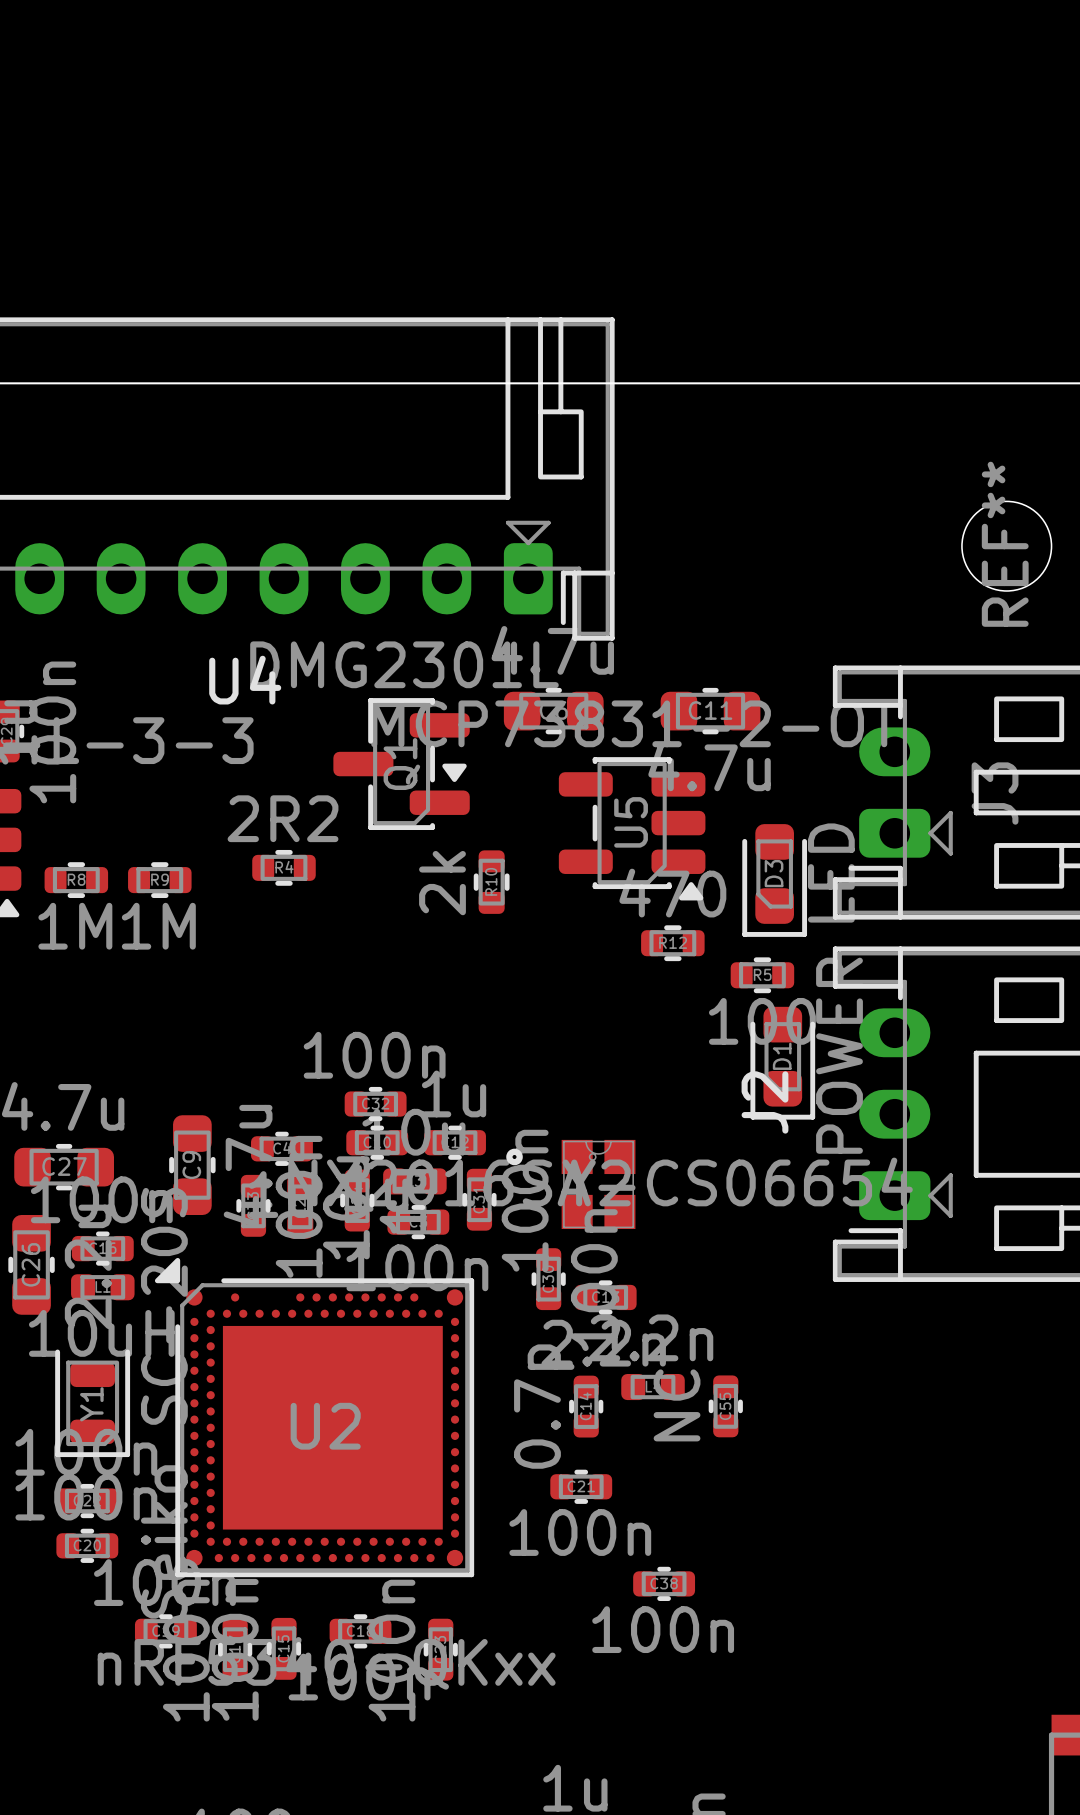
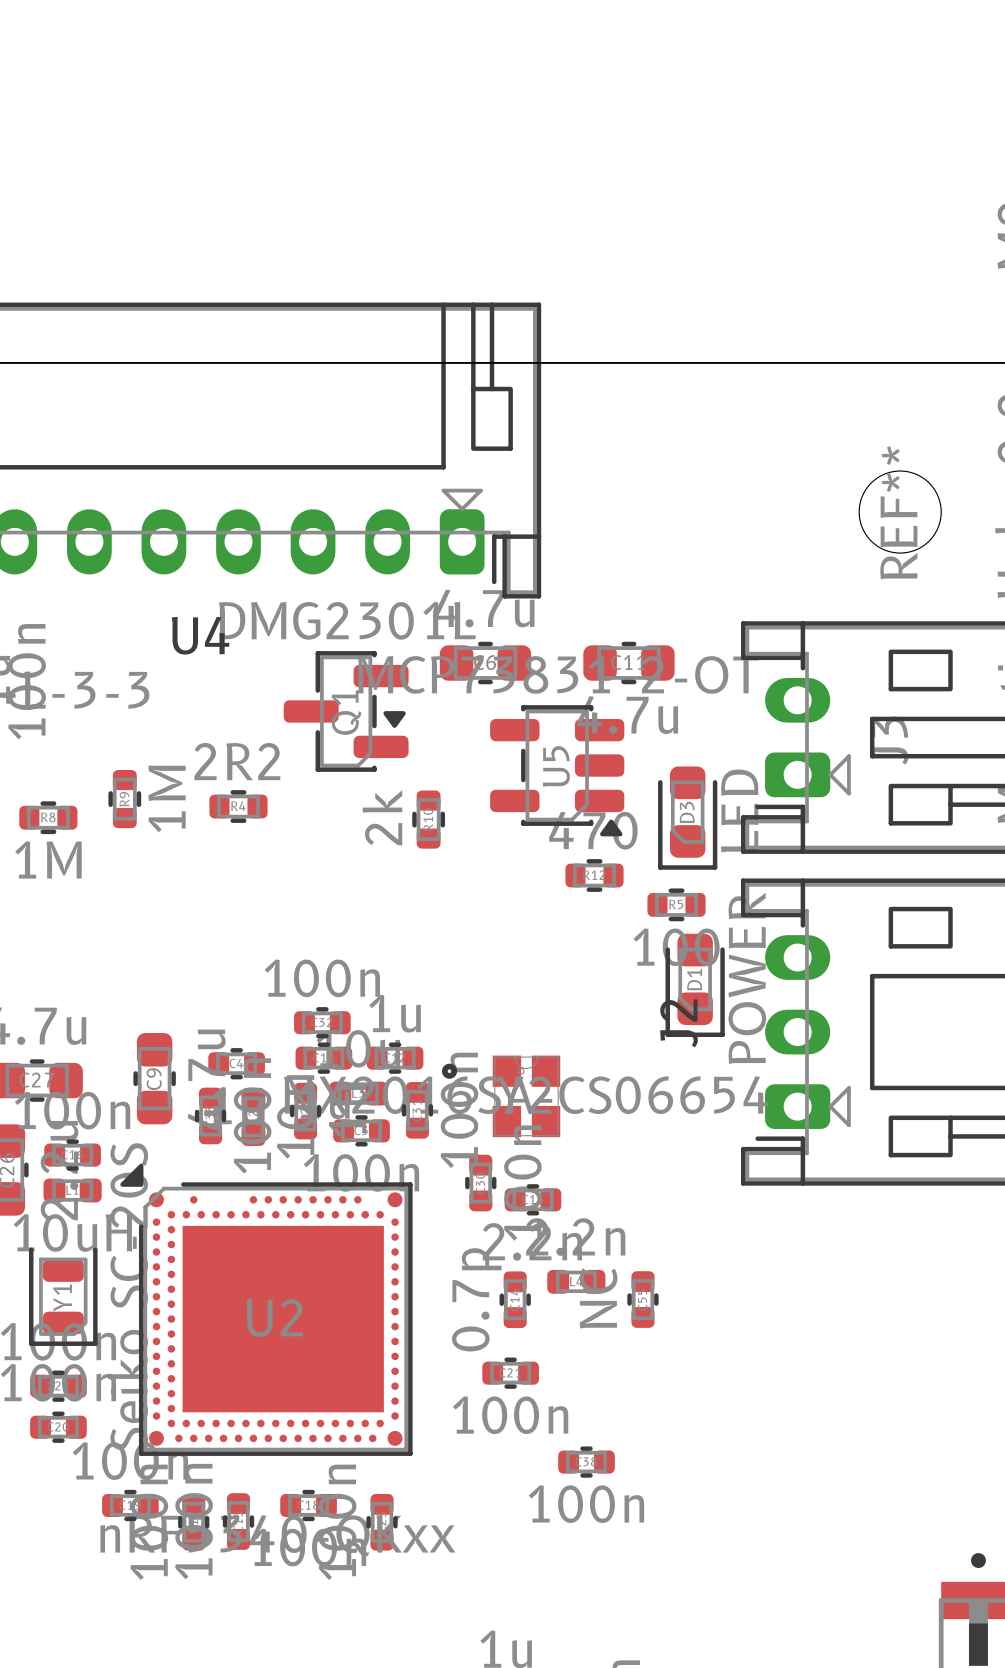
R9 rotation: 0° (159, 880) -> 90° clockwise (124, 799)

